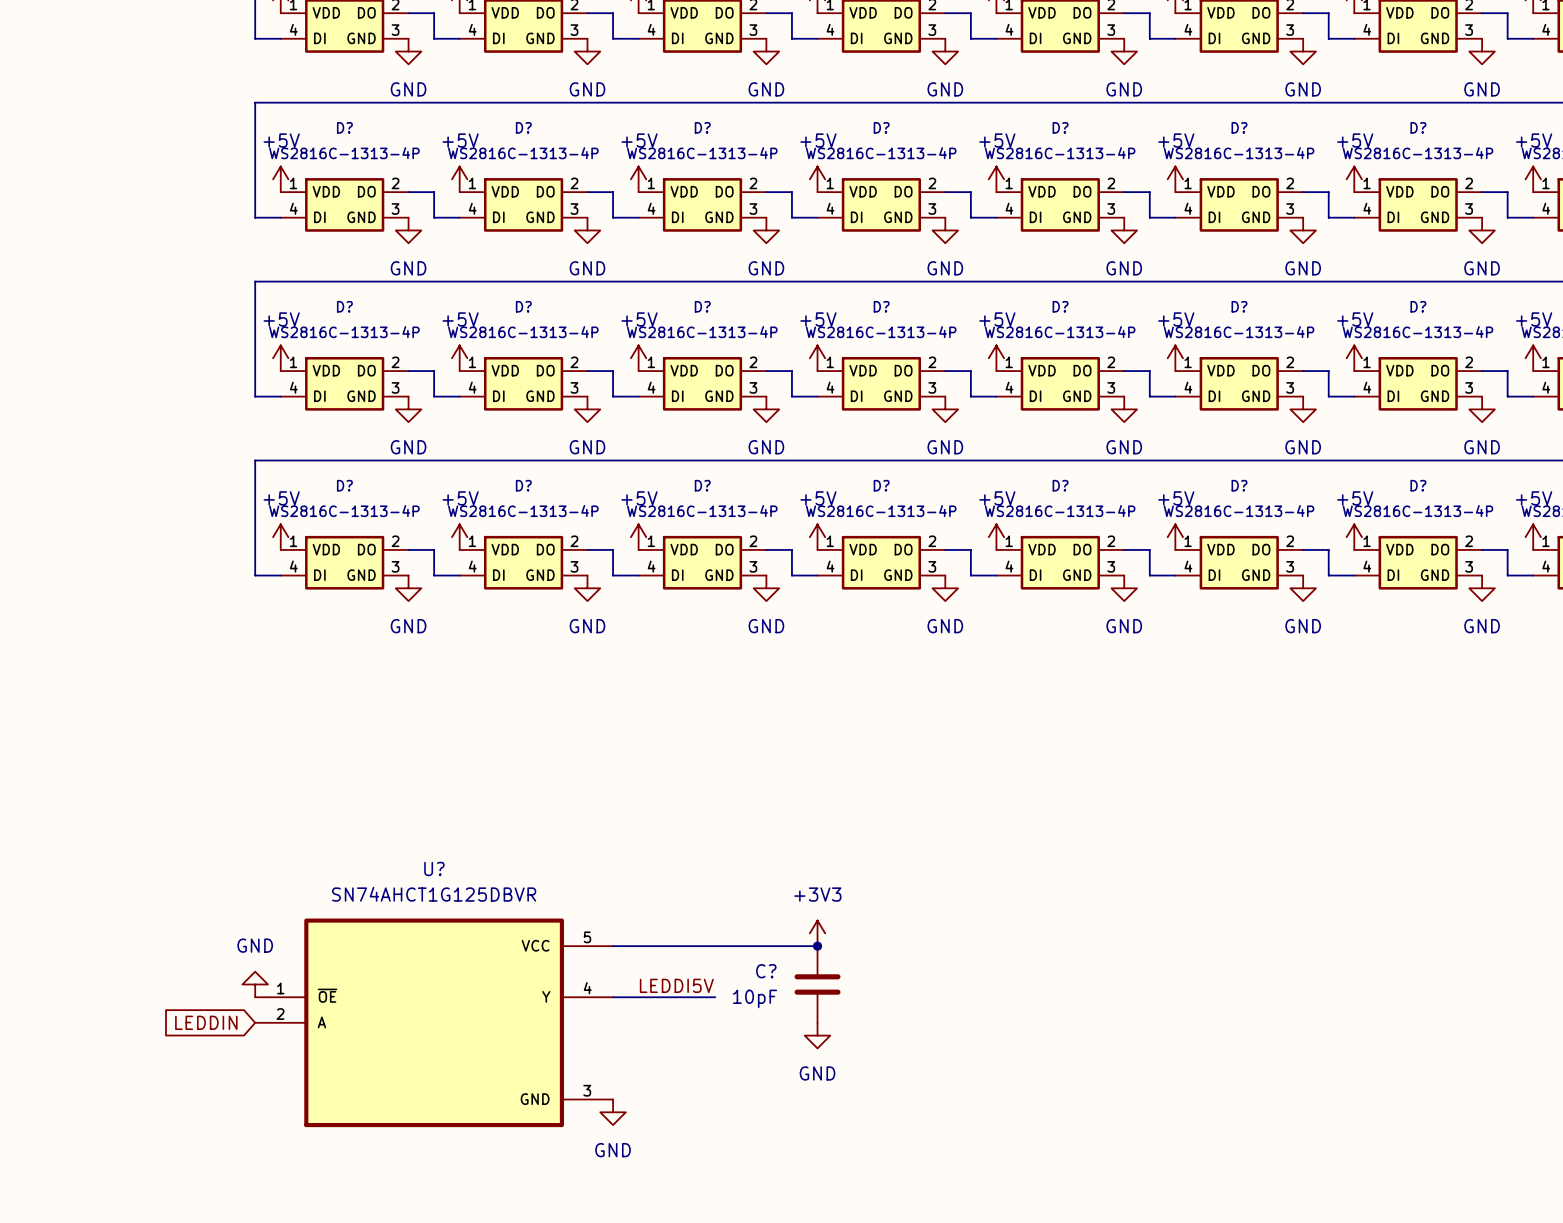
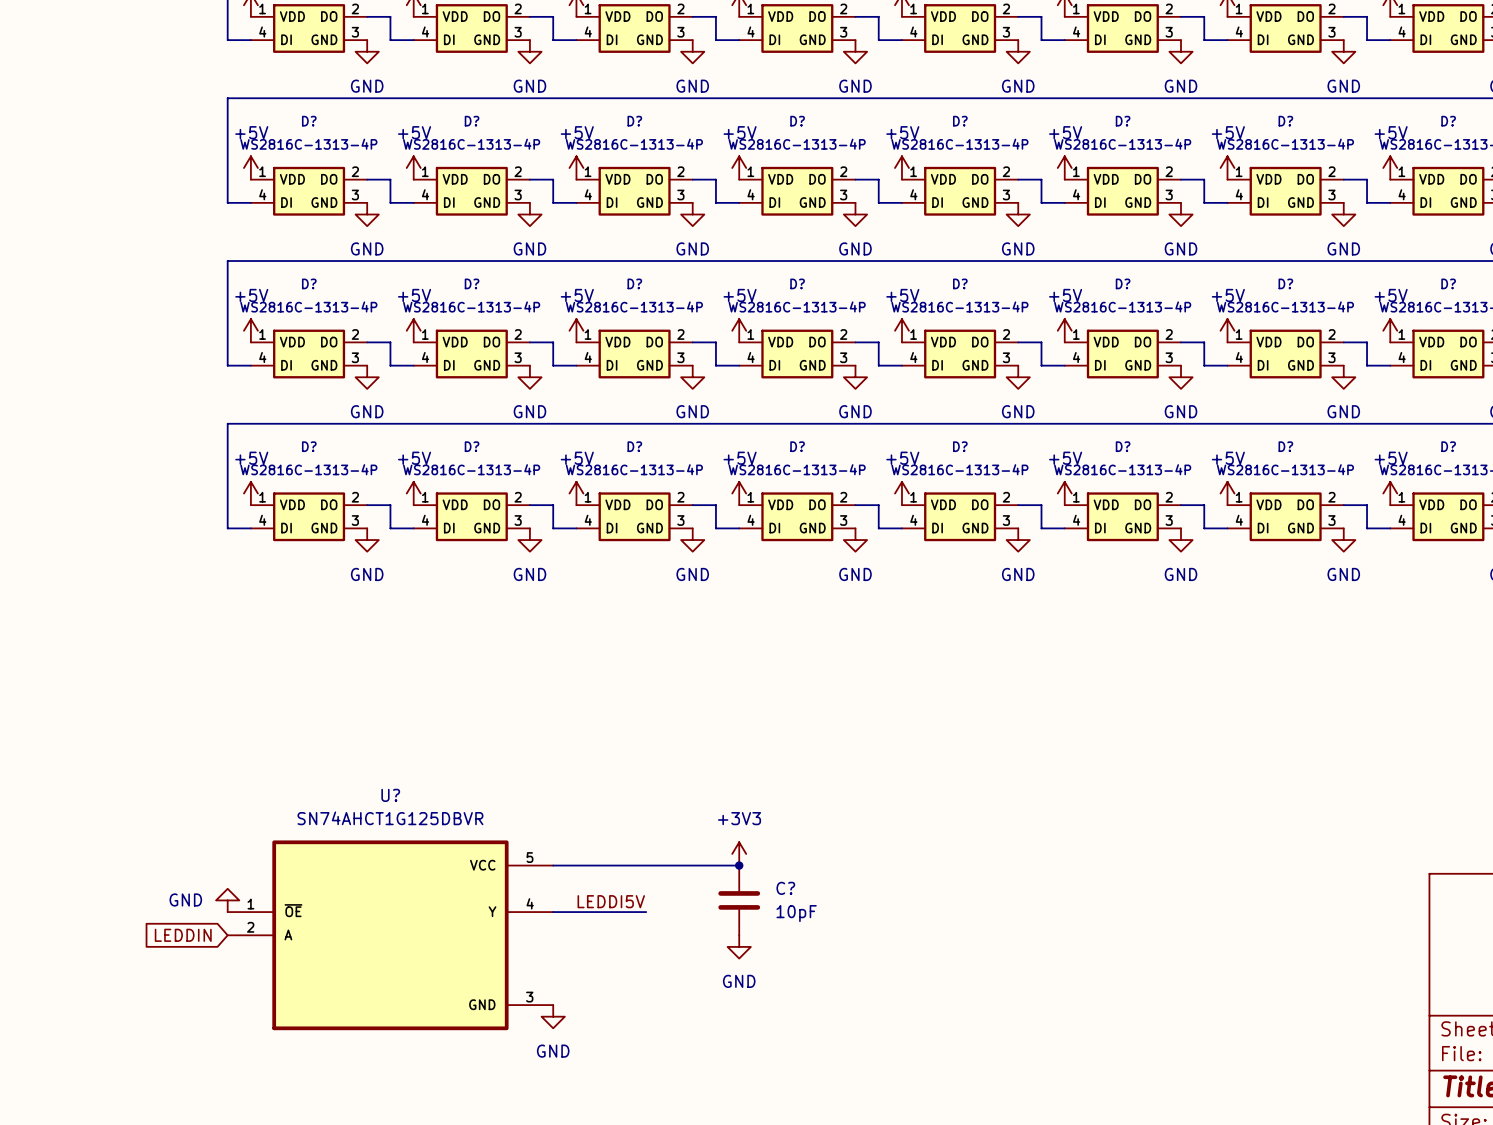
power symbol text position: GND (255, 945) -> GND (185, 899)
C? name position: C? (766, 971) -> C? (785, 888)
C? value position: 10pF (755, 998) -> 10pF (796, 913)

